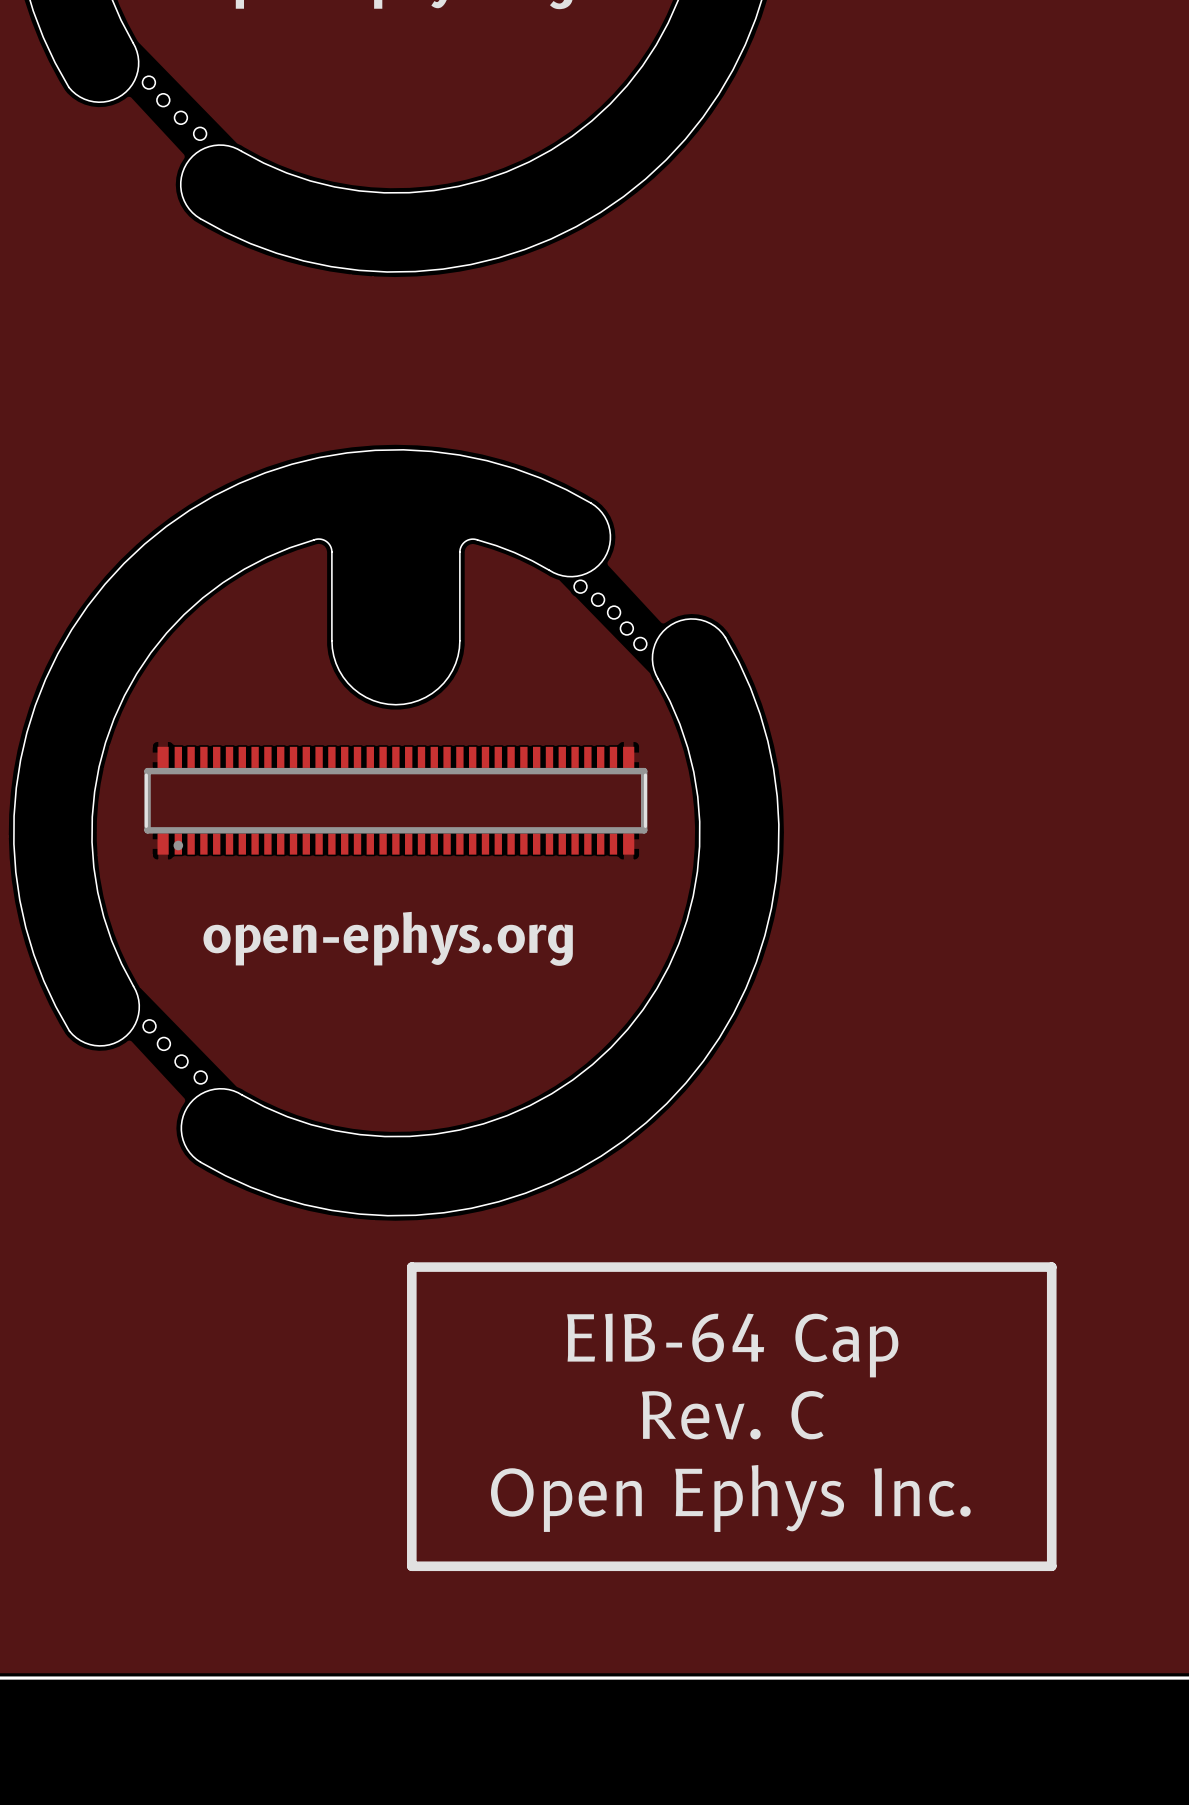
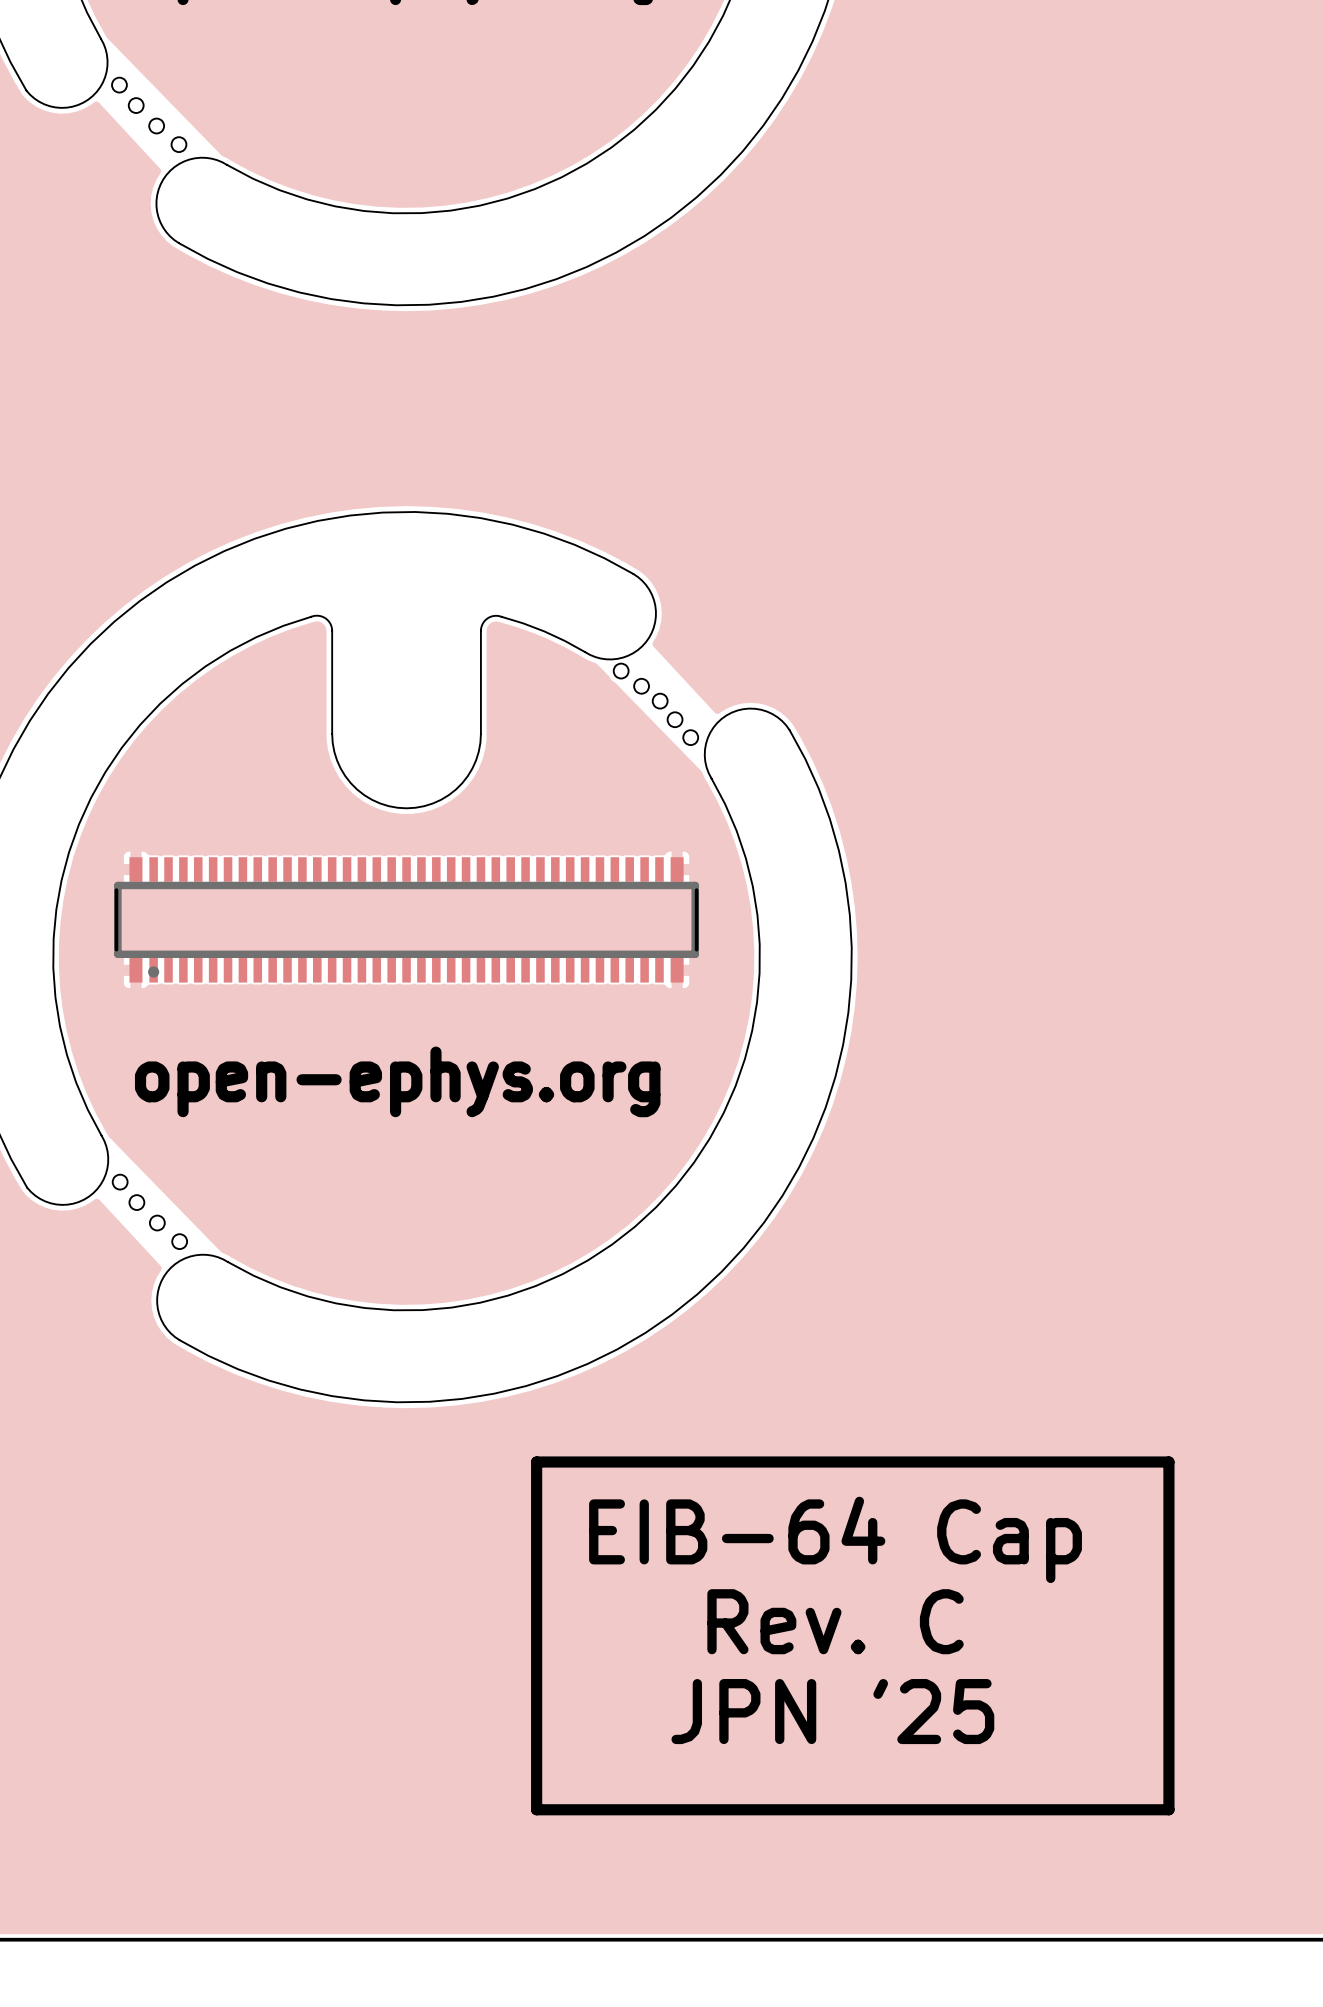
line: (507, 1267) (411, 1267) (411, 1566) (507, 1566) -> (536, 1462) (536, 1809)
text position: EIB-64 Cap (732, 1345) -> EIB-64 Cap (835, 1539)
text position: Rev. C (733, 1415) -> Rev. C (835, 1621)
text: none -> JPN '25 (832, 1711)
text: Open Ephys Inc. (730, 1498) -> none

